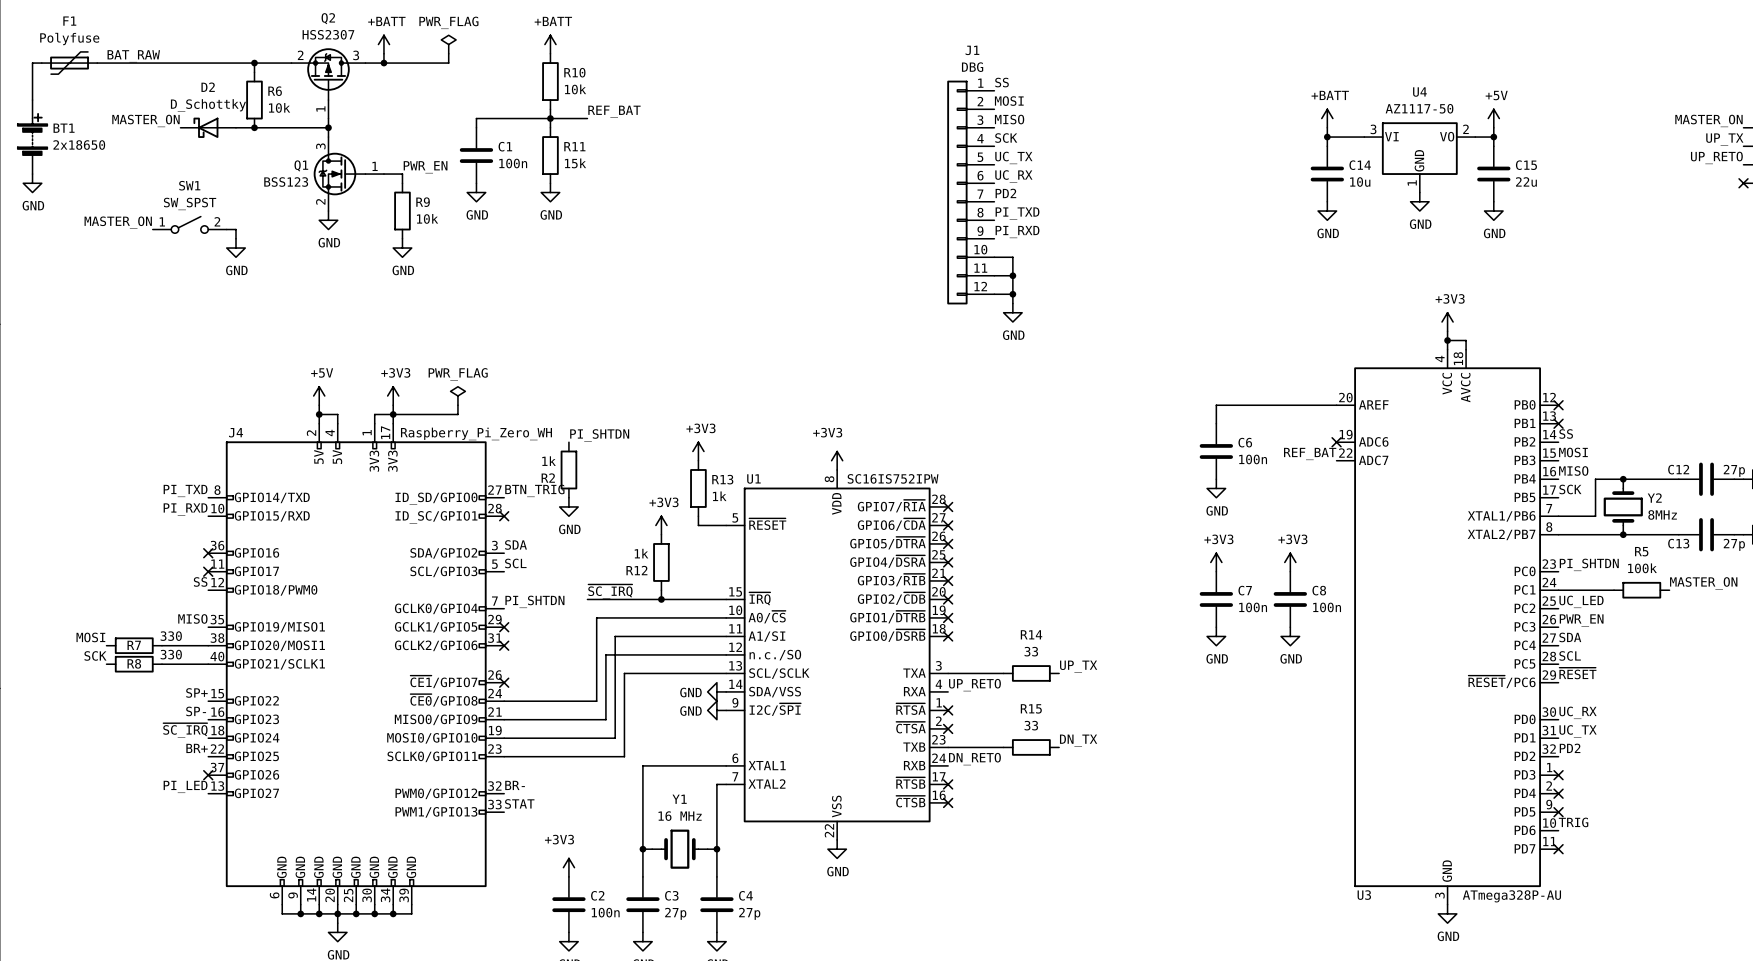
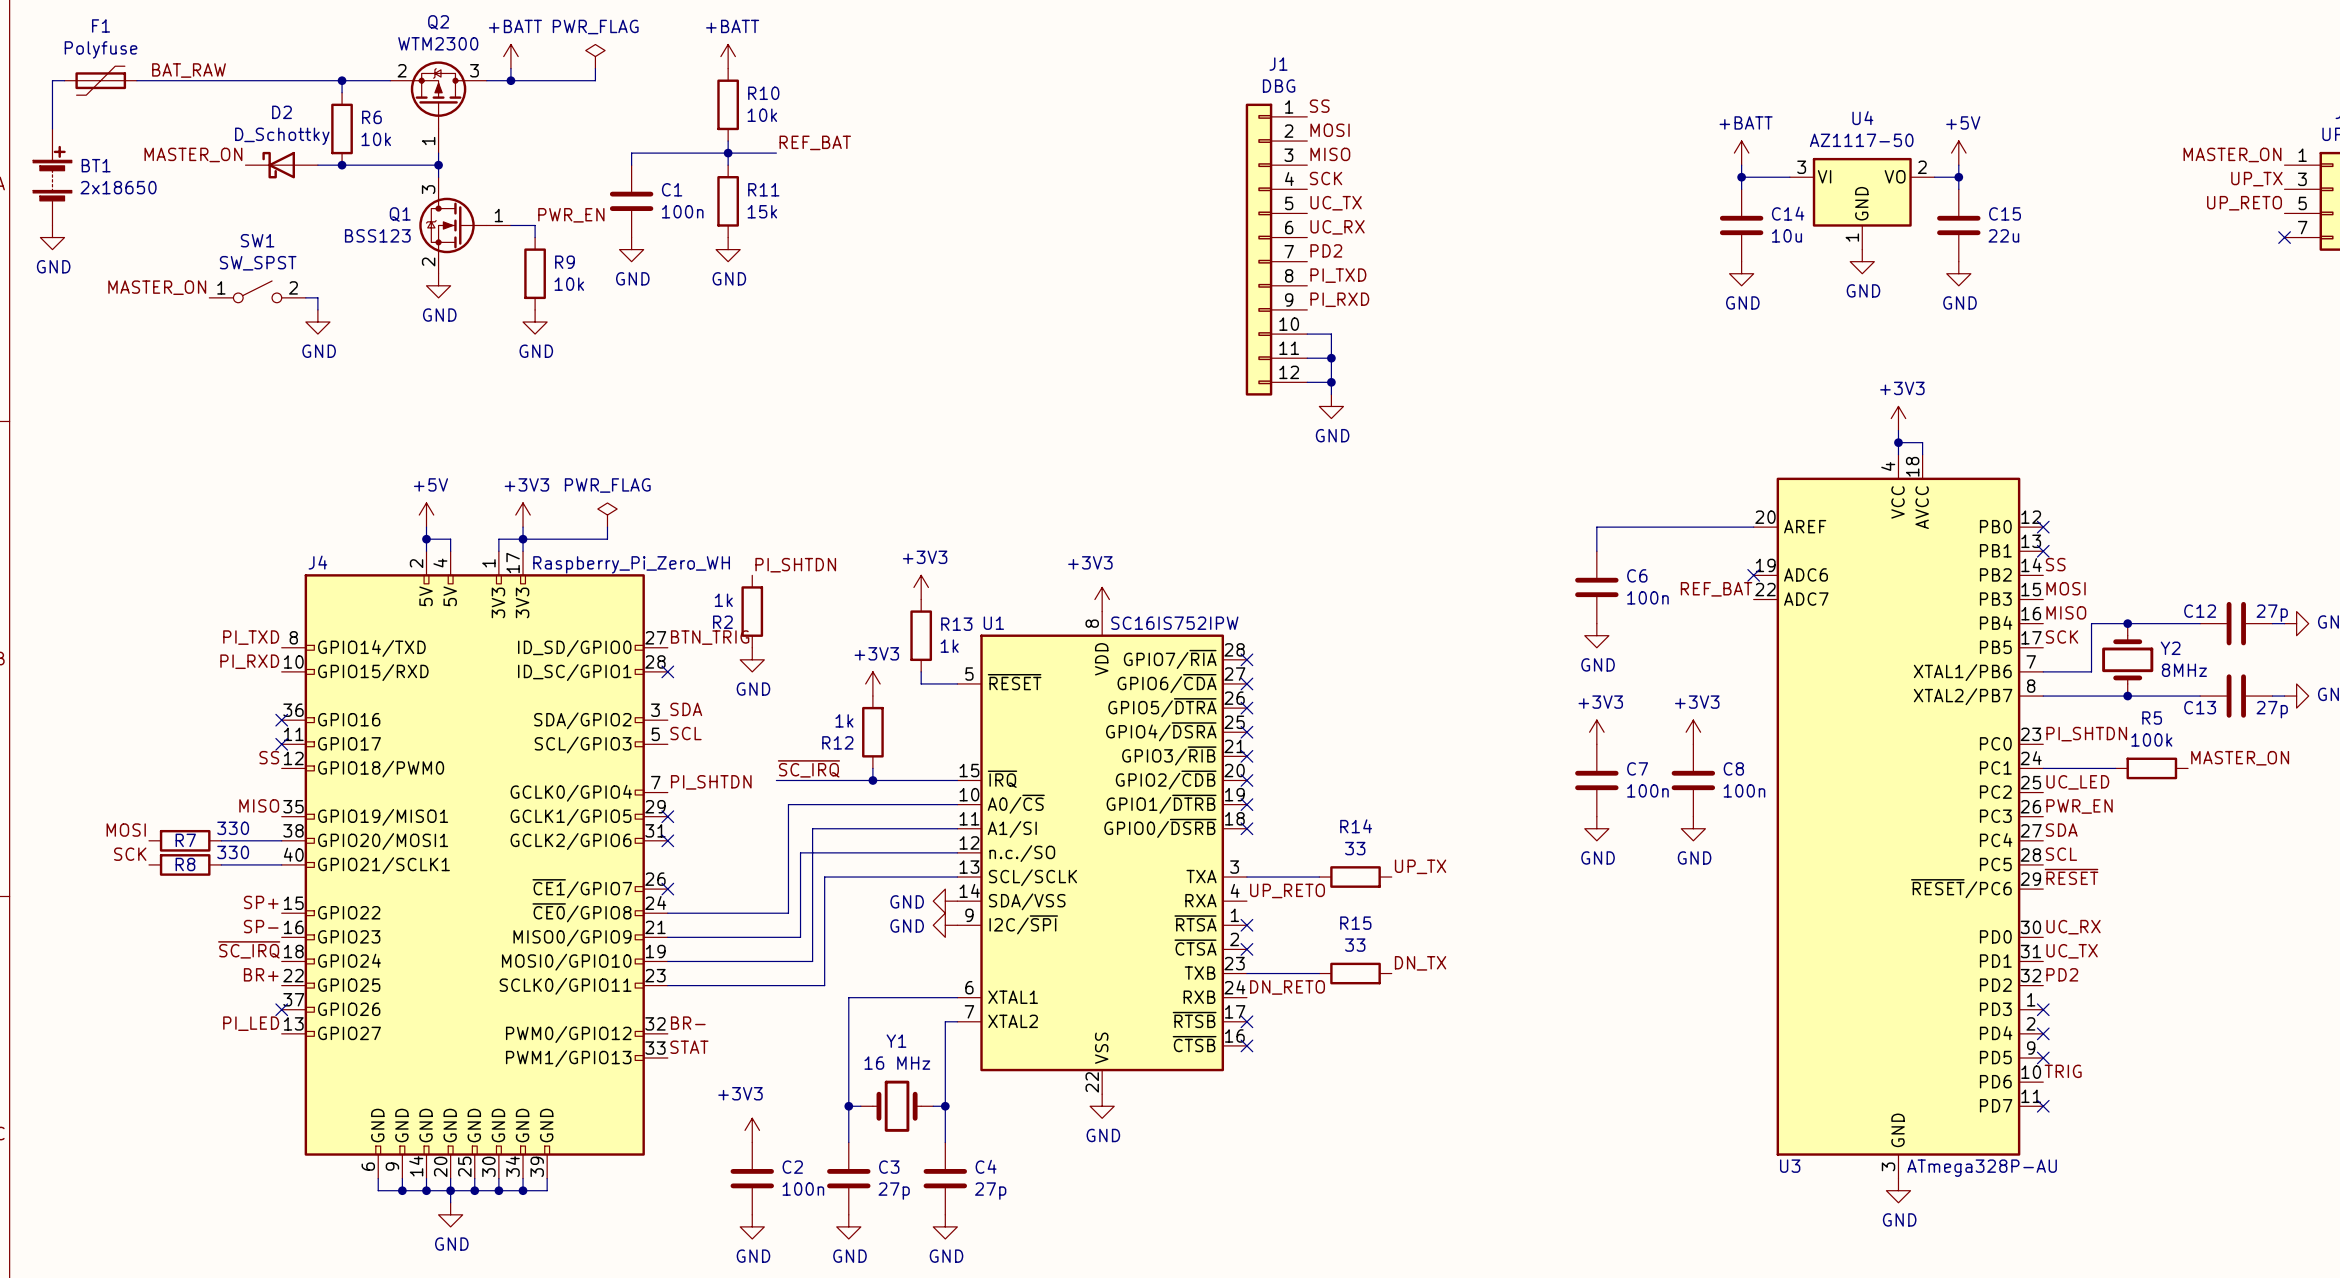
Q2 value: HSS2307 (328, 34) -> WTM2300 (438, 43)

